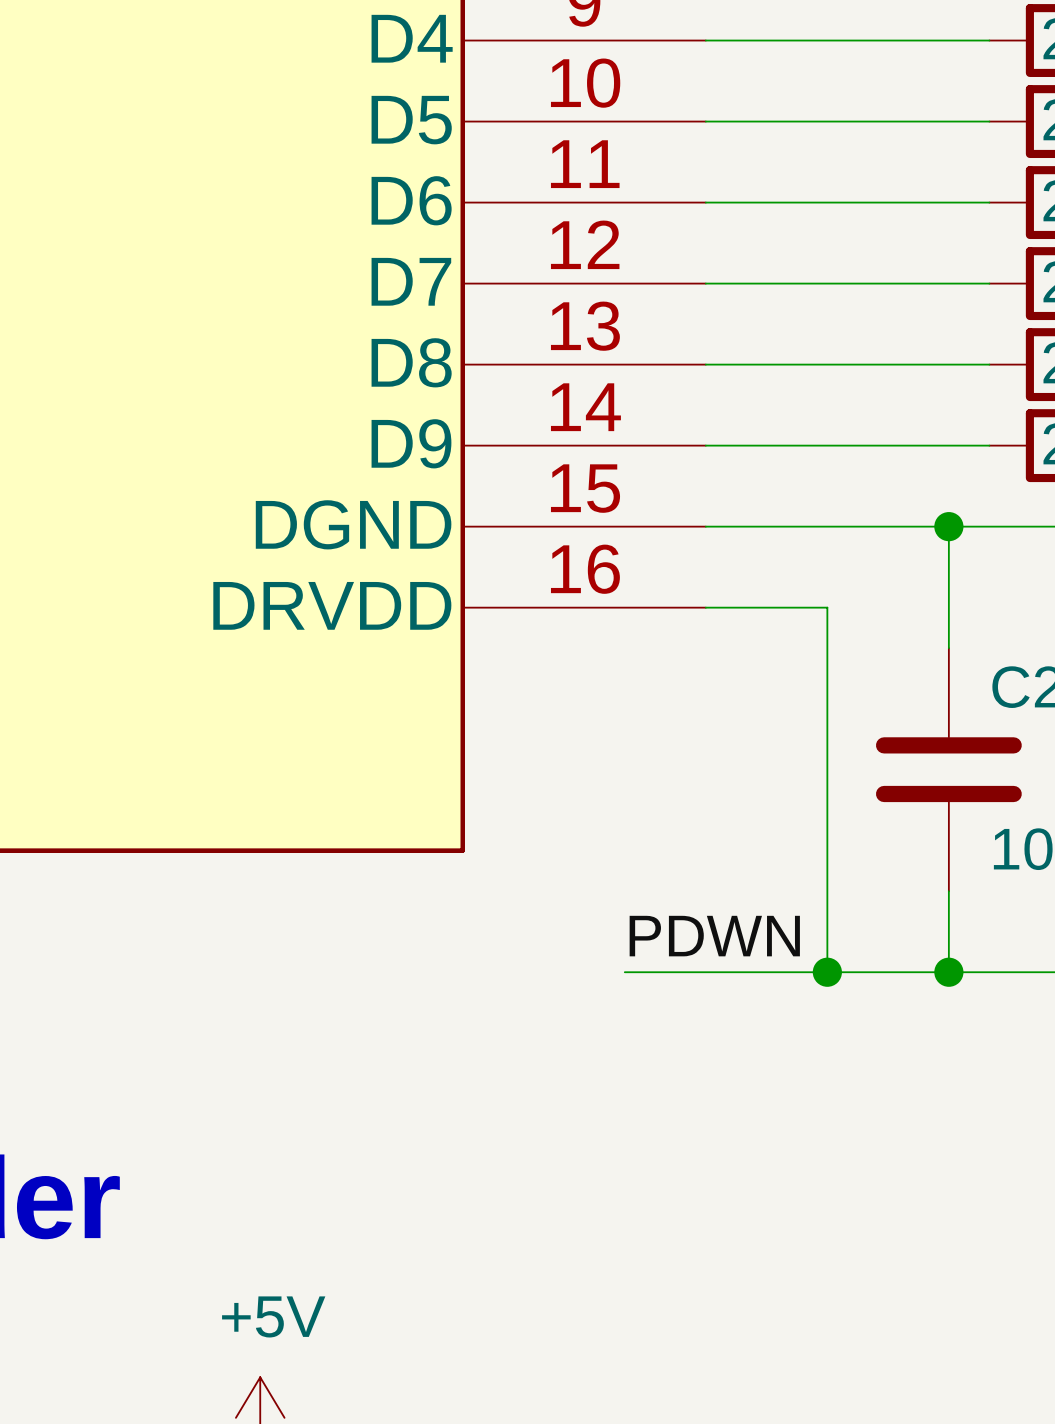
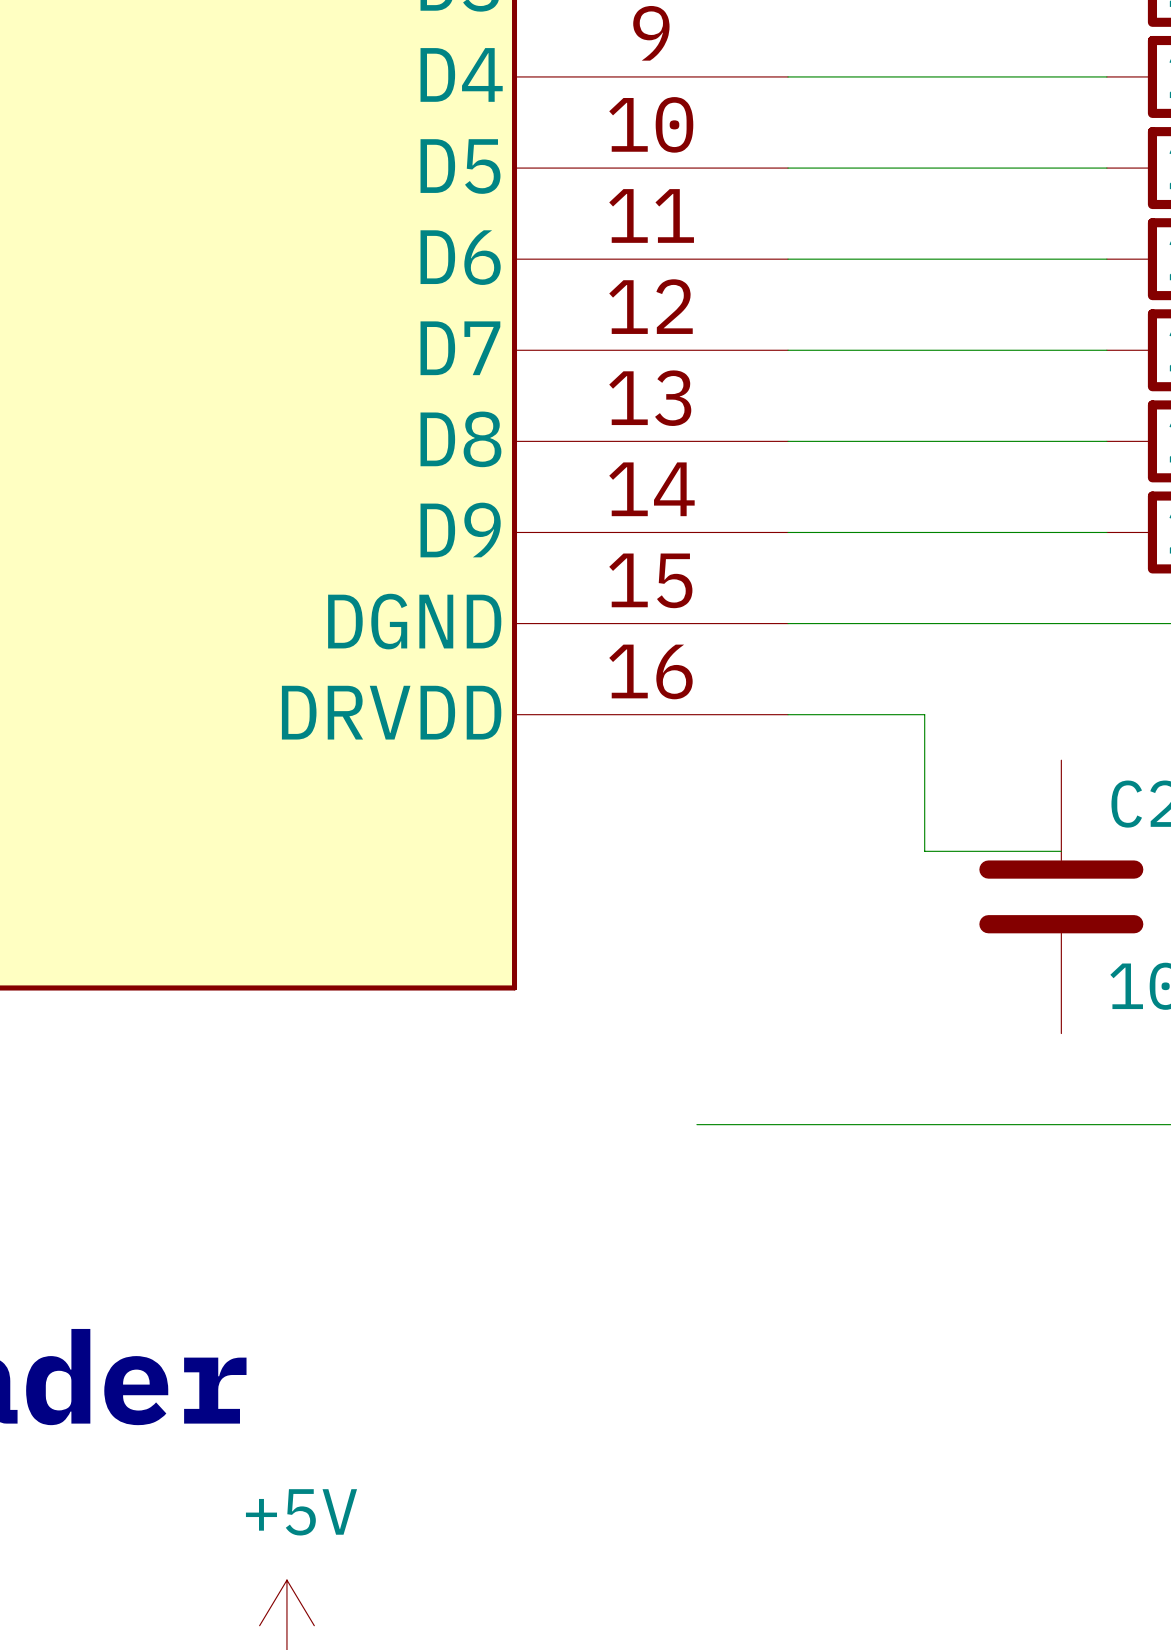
wire: (948, 526) (948, 648) -> none
junction: (948, 526) -> none
wire: (827, 729) (827, 972) -> (924, 851) (1061, 851)
wire: (948, 891) (948, 972) -> none
label: PDWN (714, 936) -> none
junction: (827, 972) -> none
junction: (948, 972) -> none

